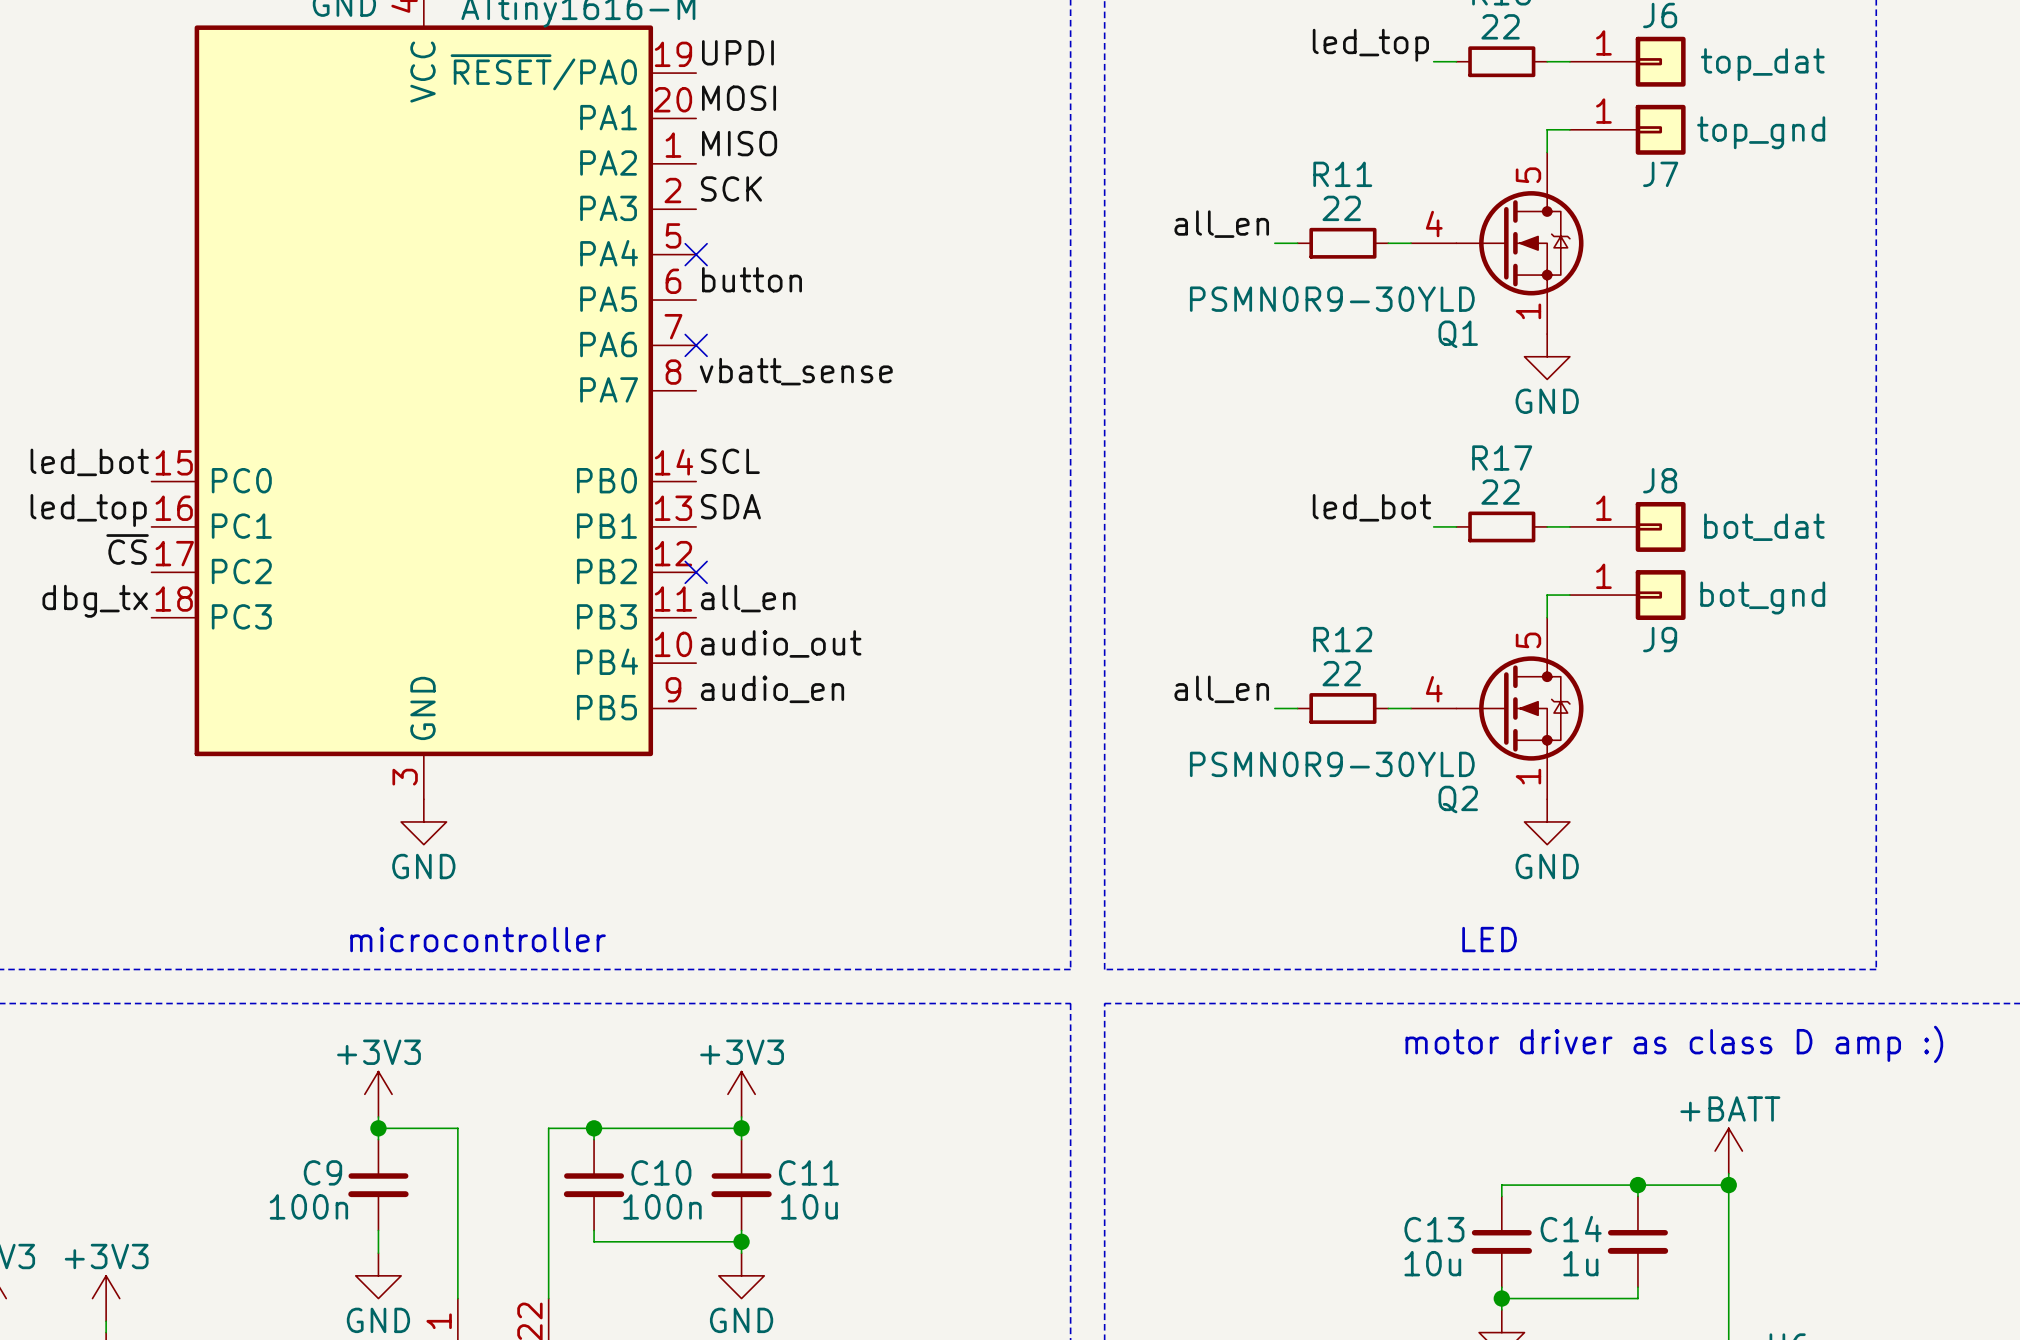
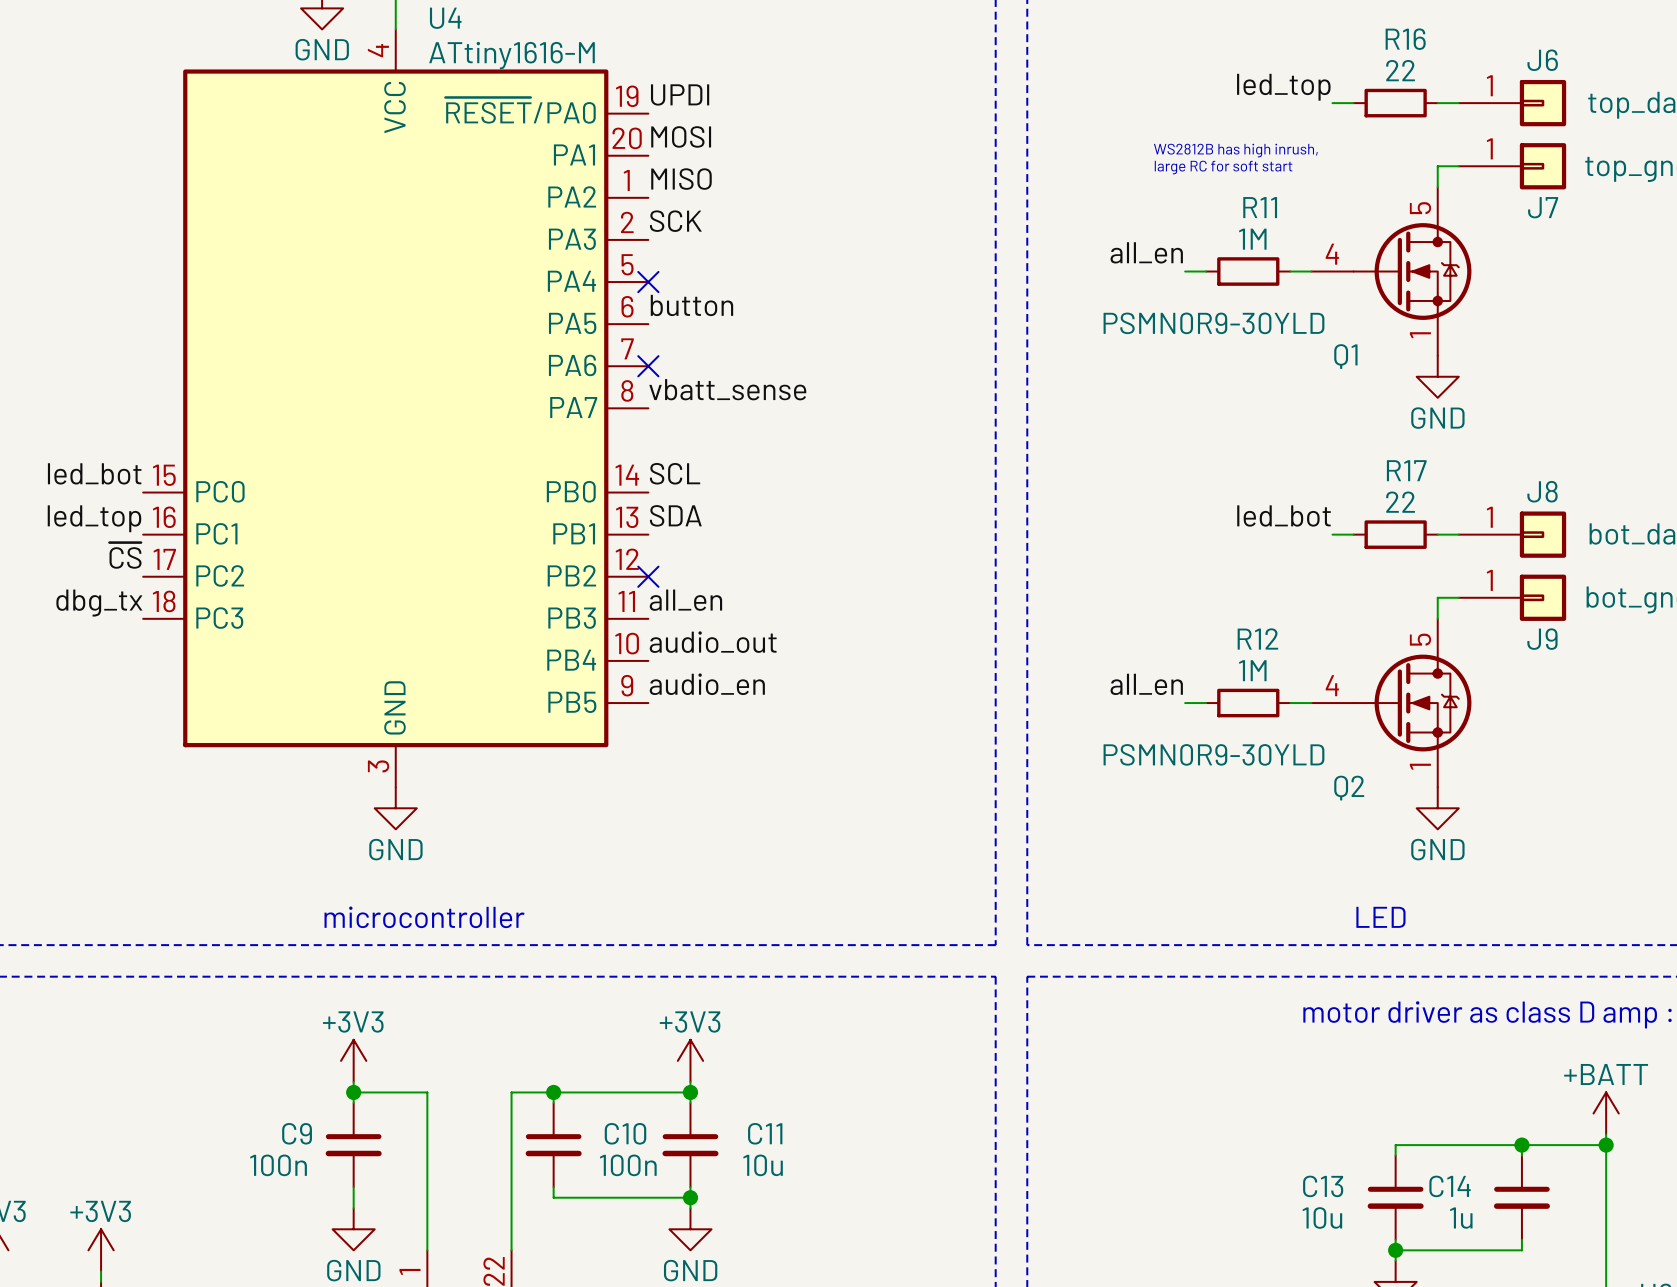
text: none -> WS2812B has high inrush, (1235, 150)
text: none -> large RC for soft start (1223, 167)
R11 value: 22 (1341, 208) -> 1M (1252, 239)
R12 value: 22 (1341, 673) -> 1M (1252, 670)

